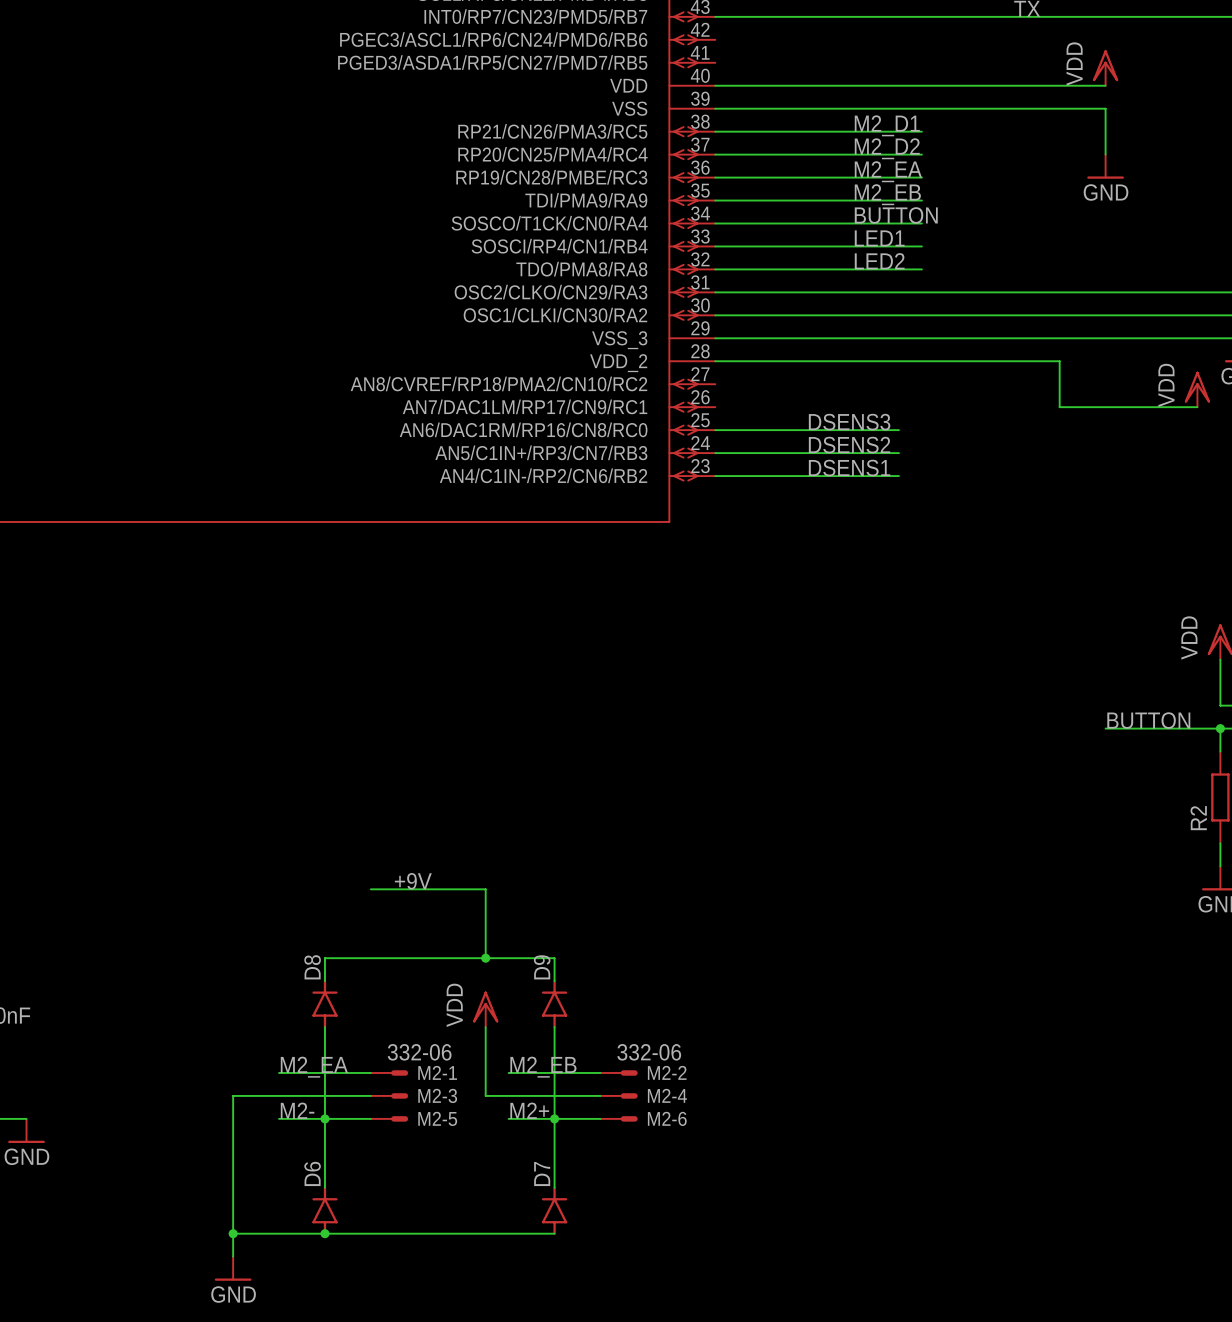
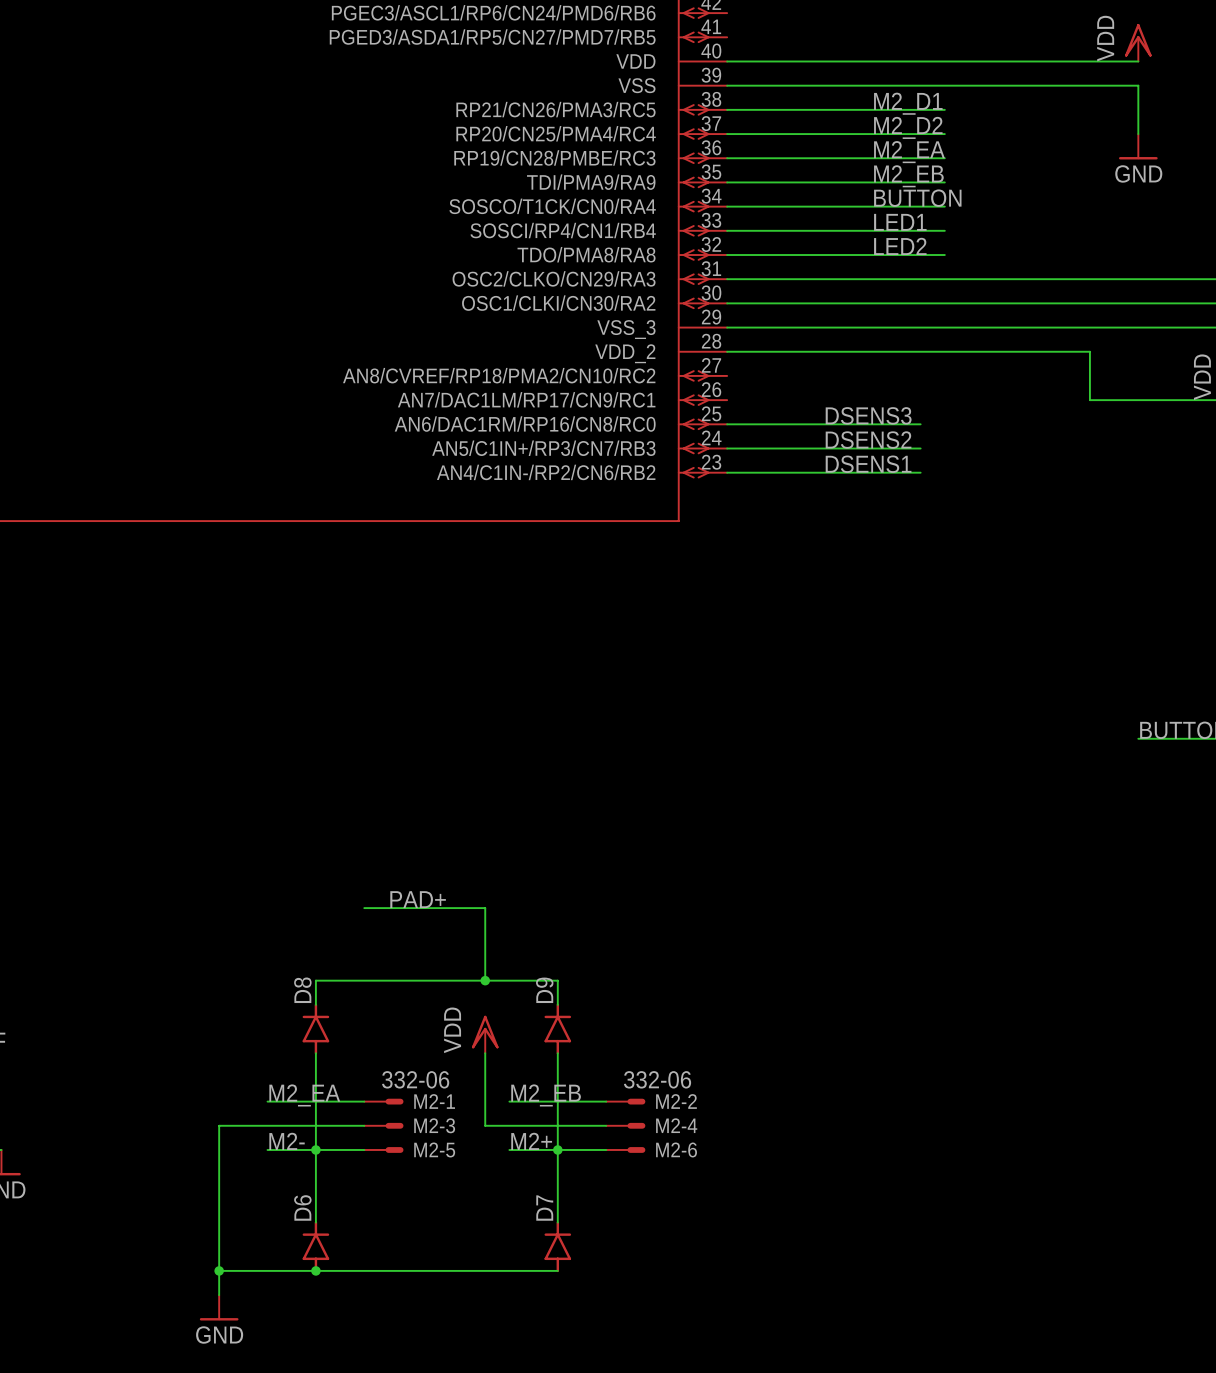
label: +9V (413, 881) -> PAD+ (418, 899)

